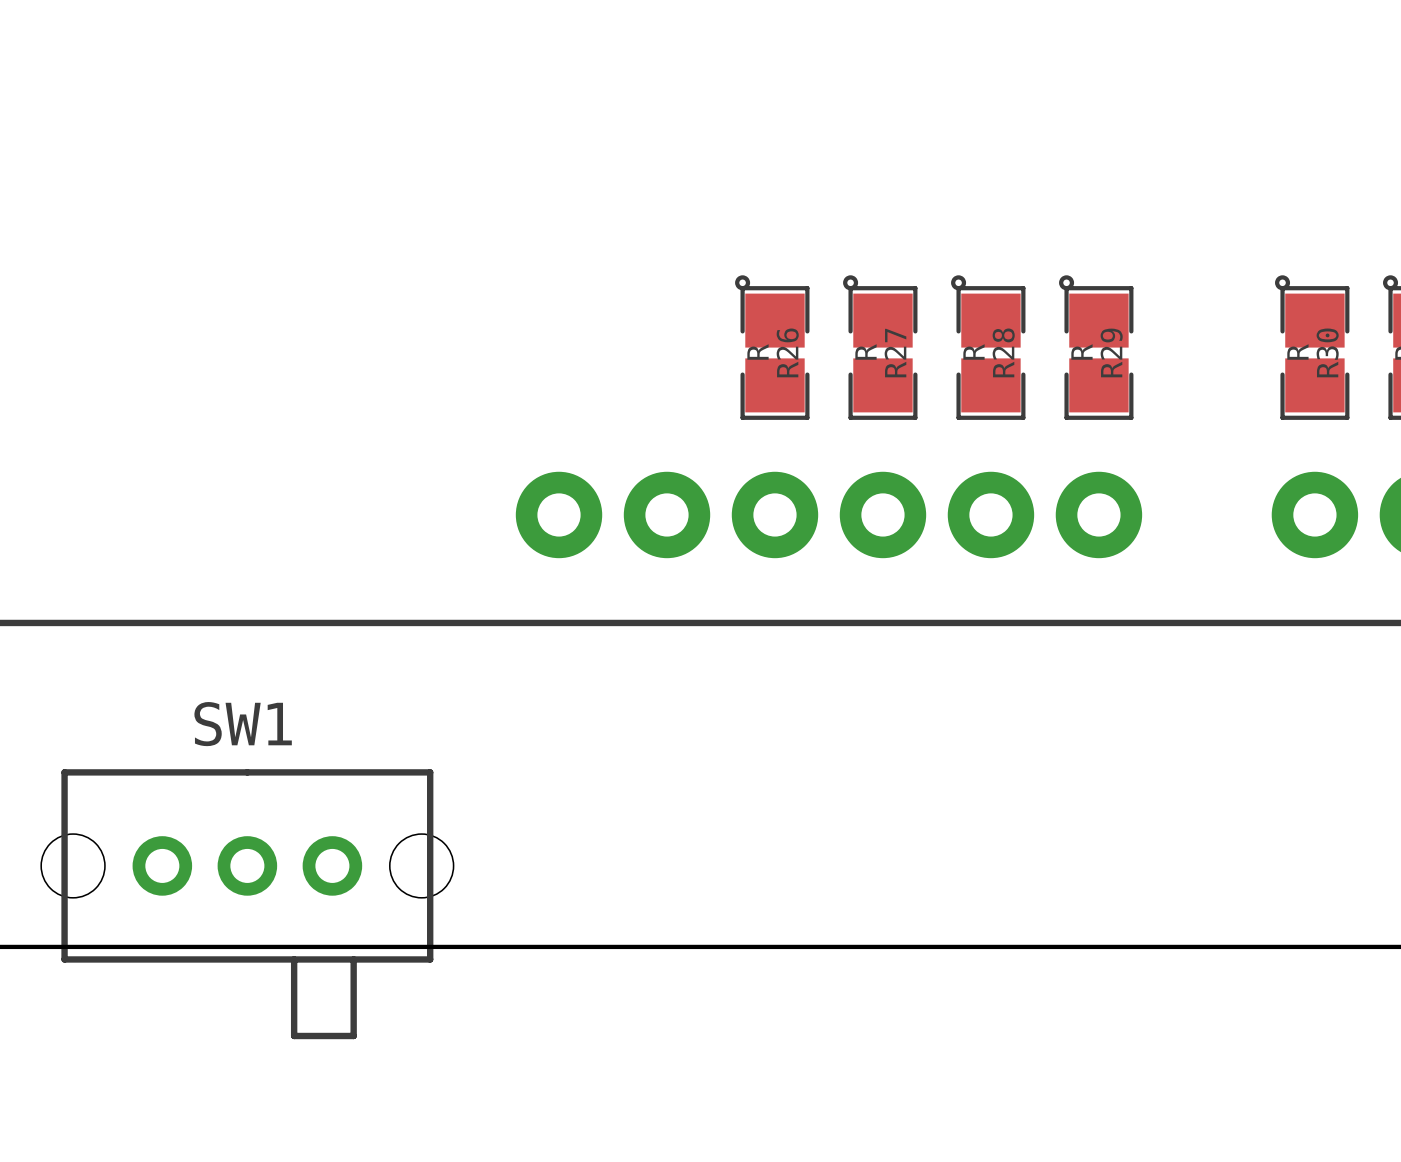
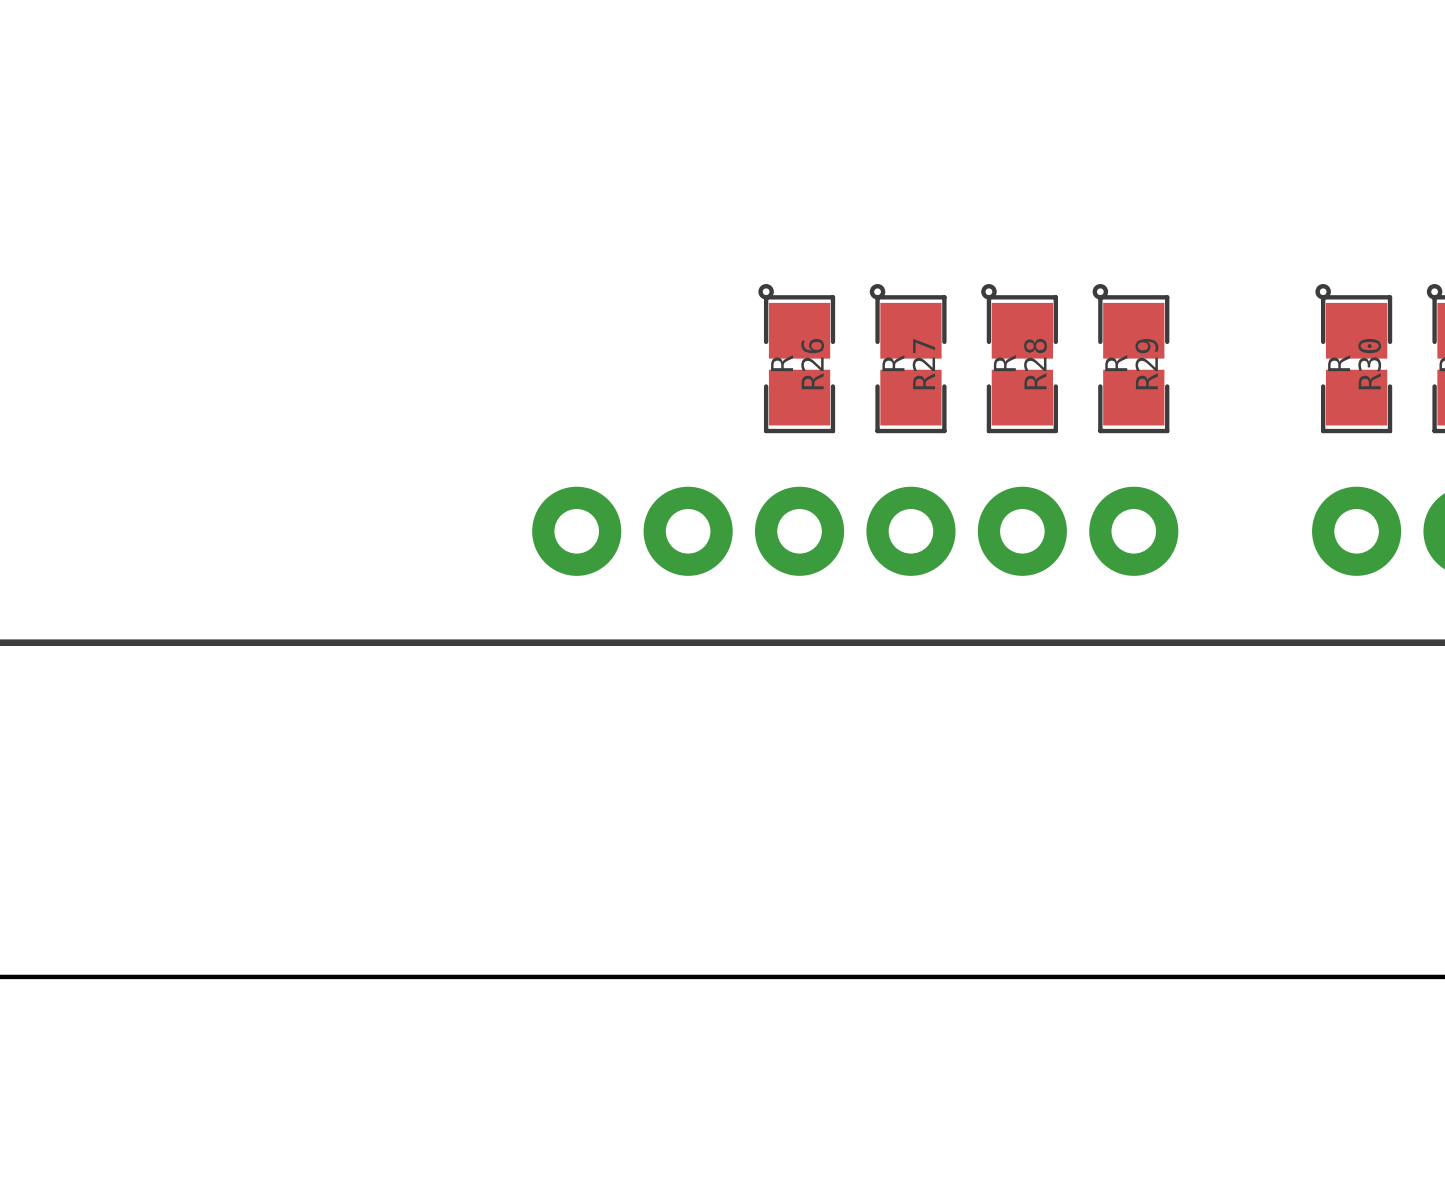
SW1: (247, 904) -> none

